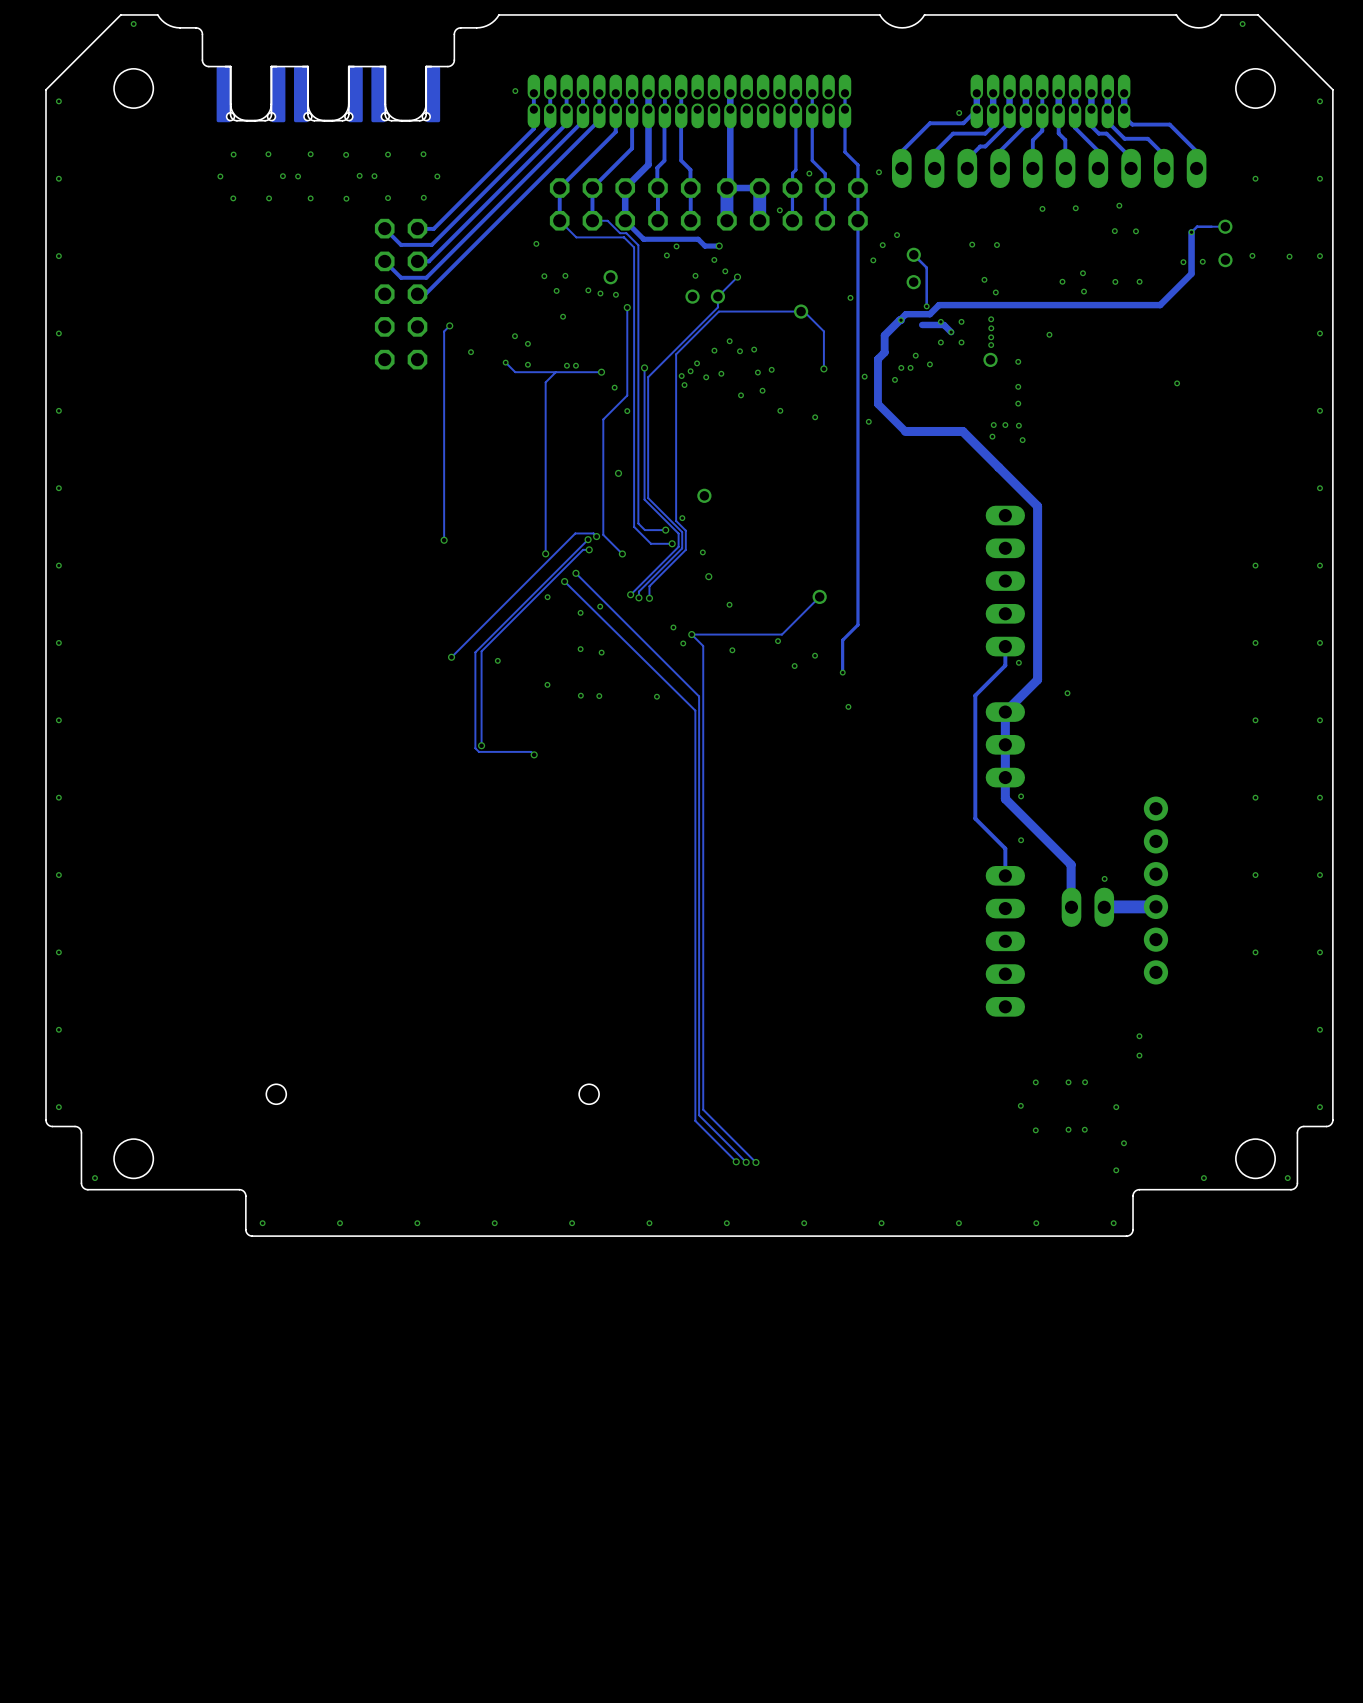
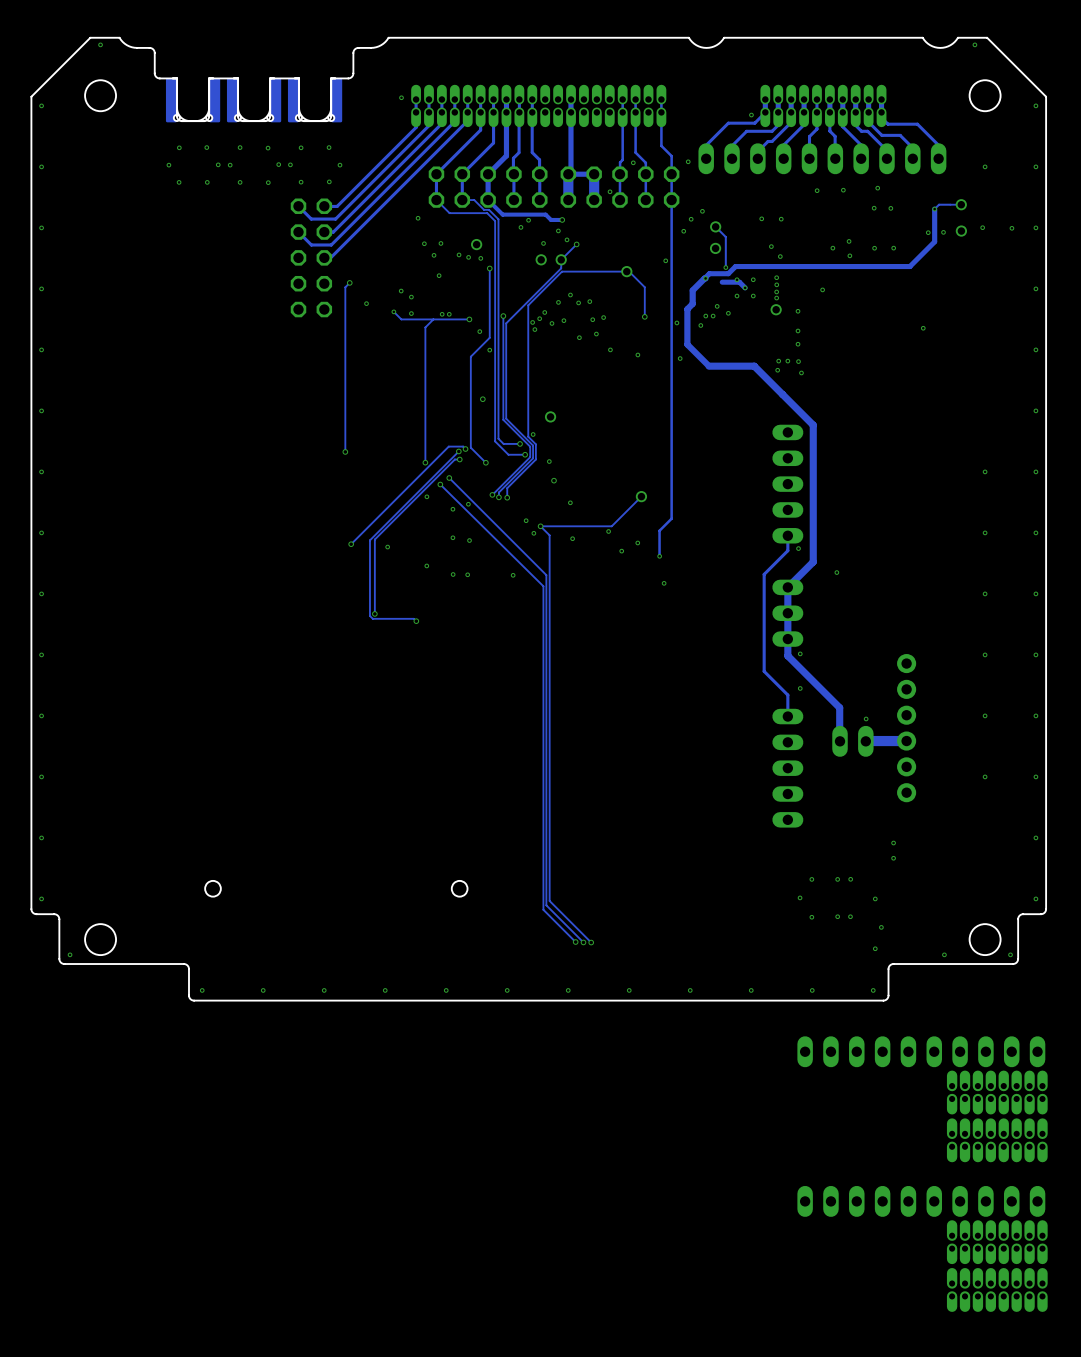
part: none -> (921, 1051)
part: none -> (997, 1092)
part: none -> (997, 1140)
part: none -> (921, 1201)
part: none -> (997, 1242)
part: none -> (997, 1289)

